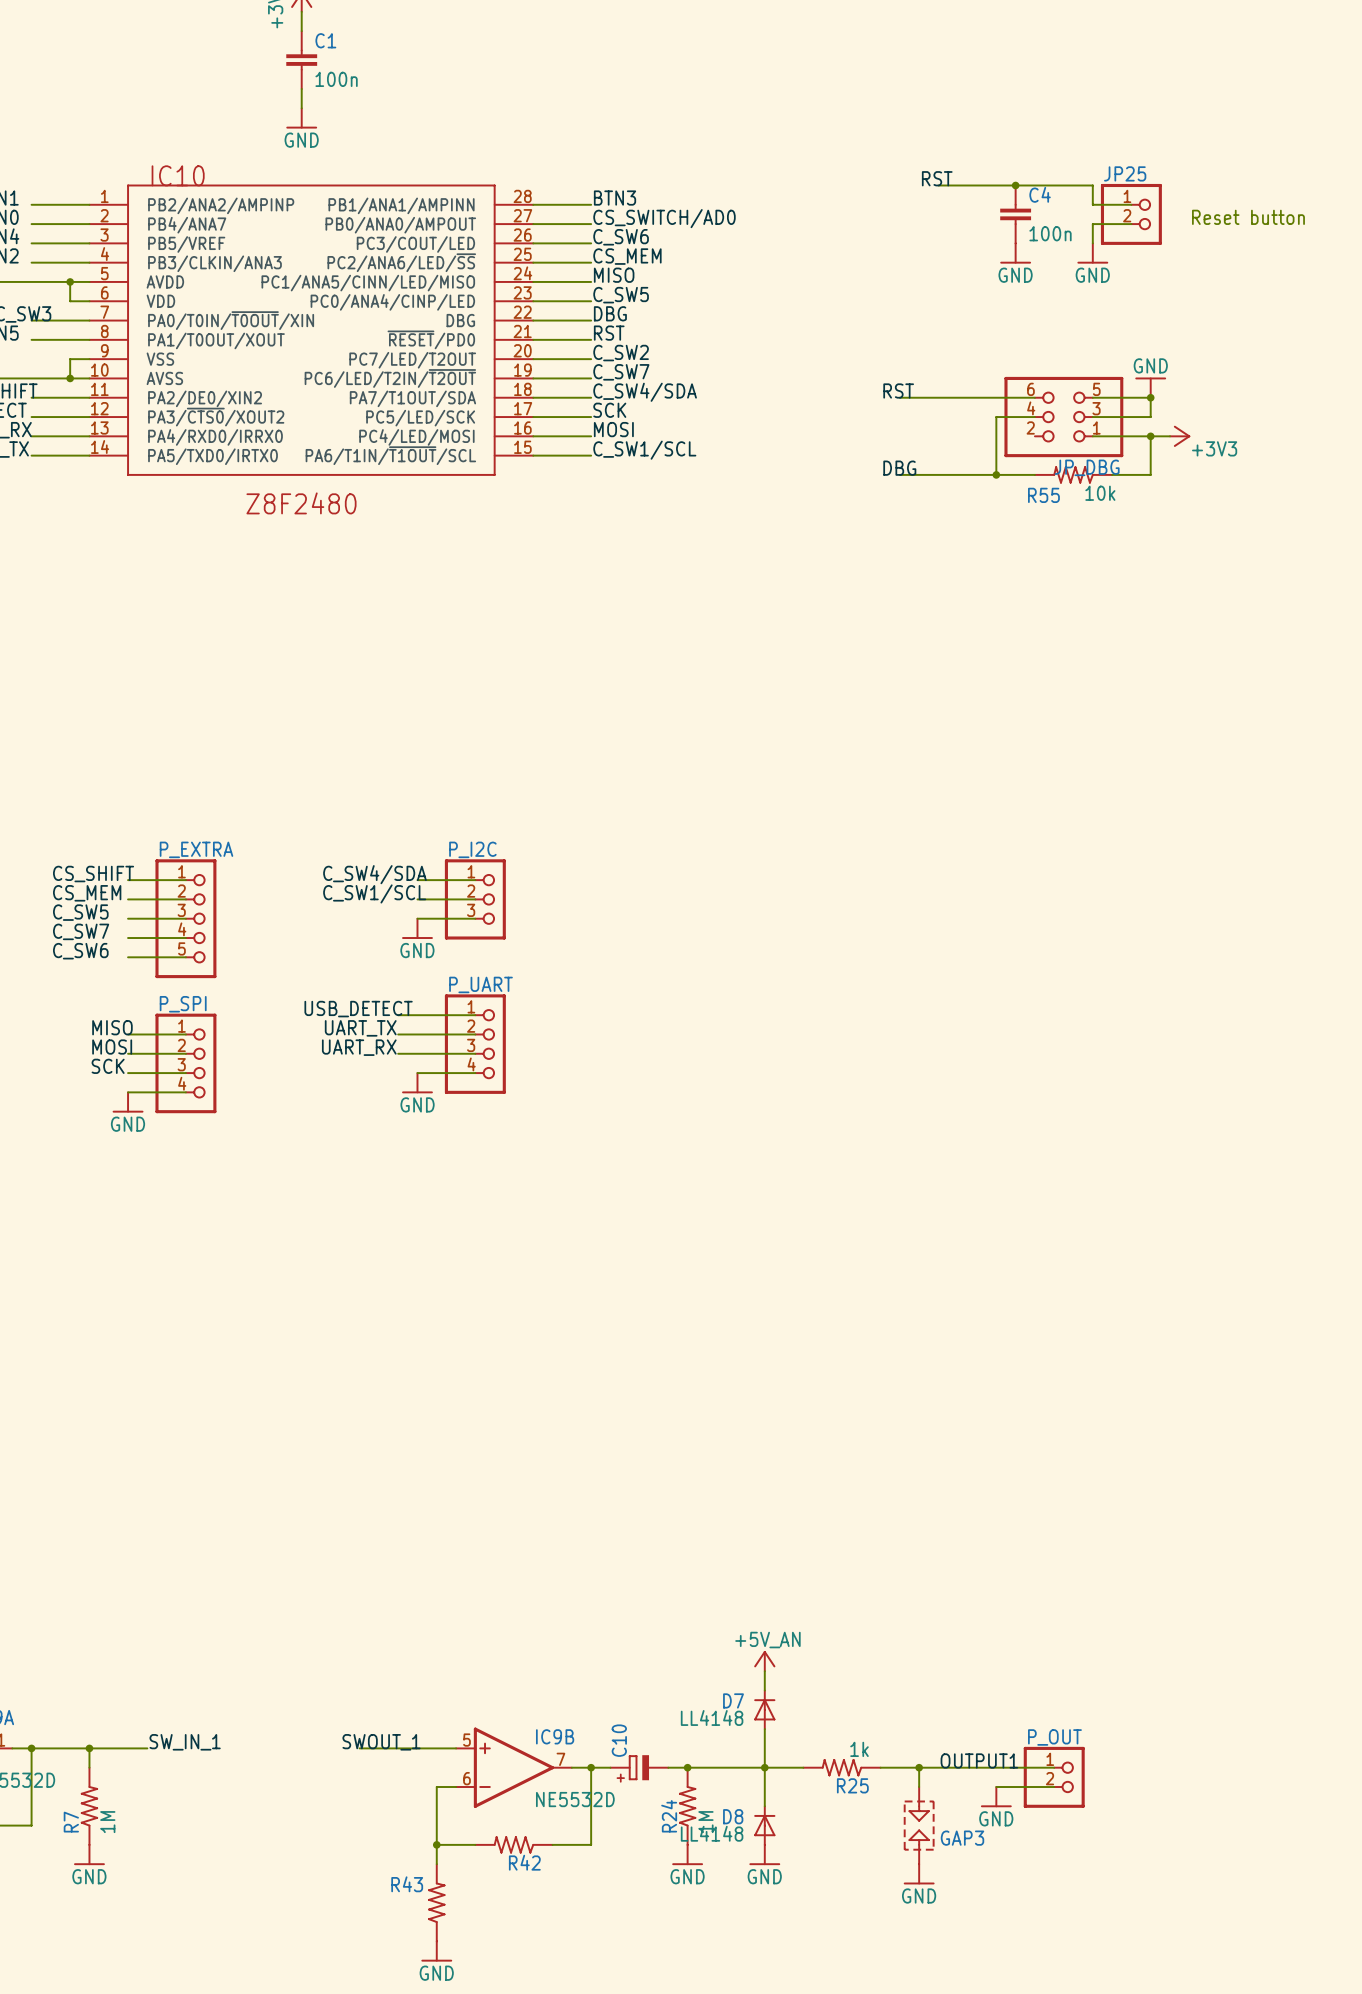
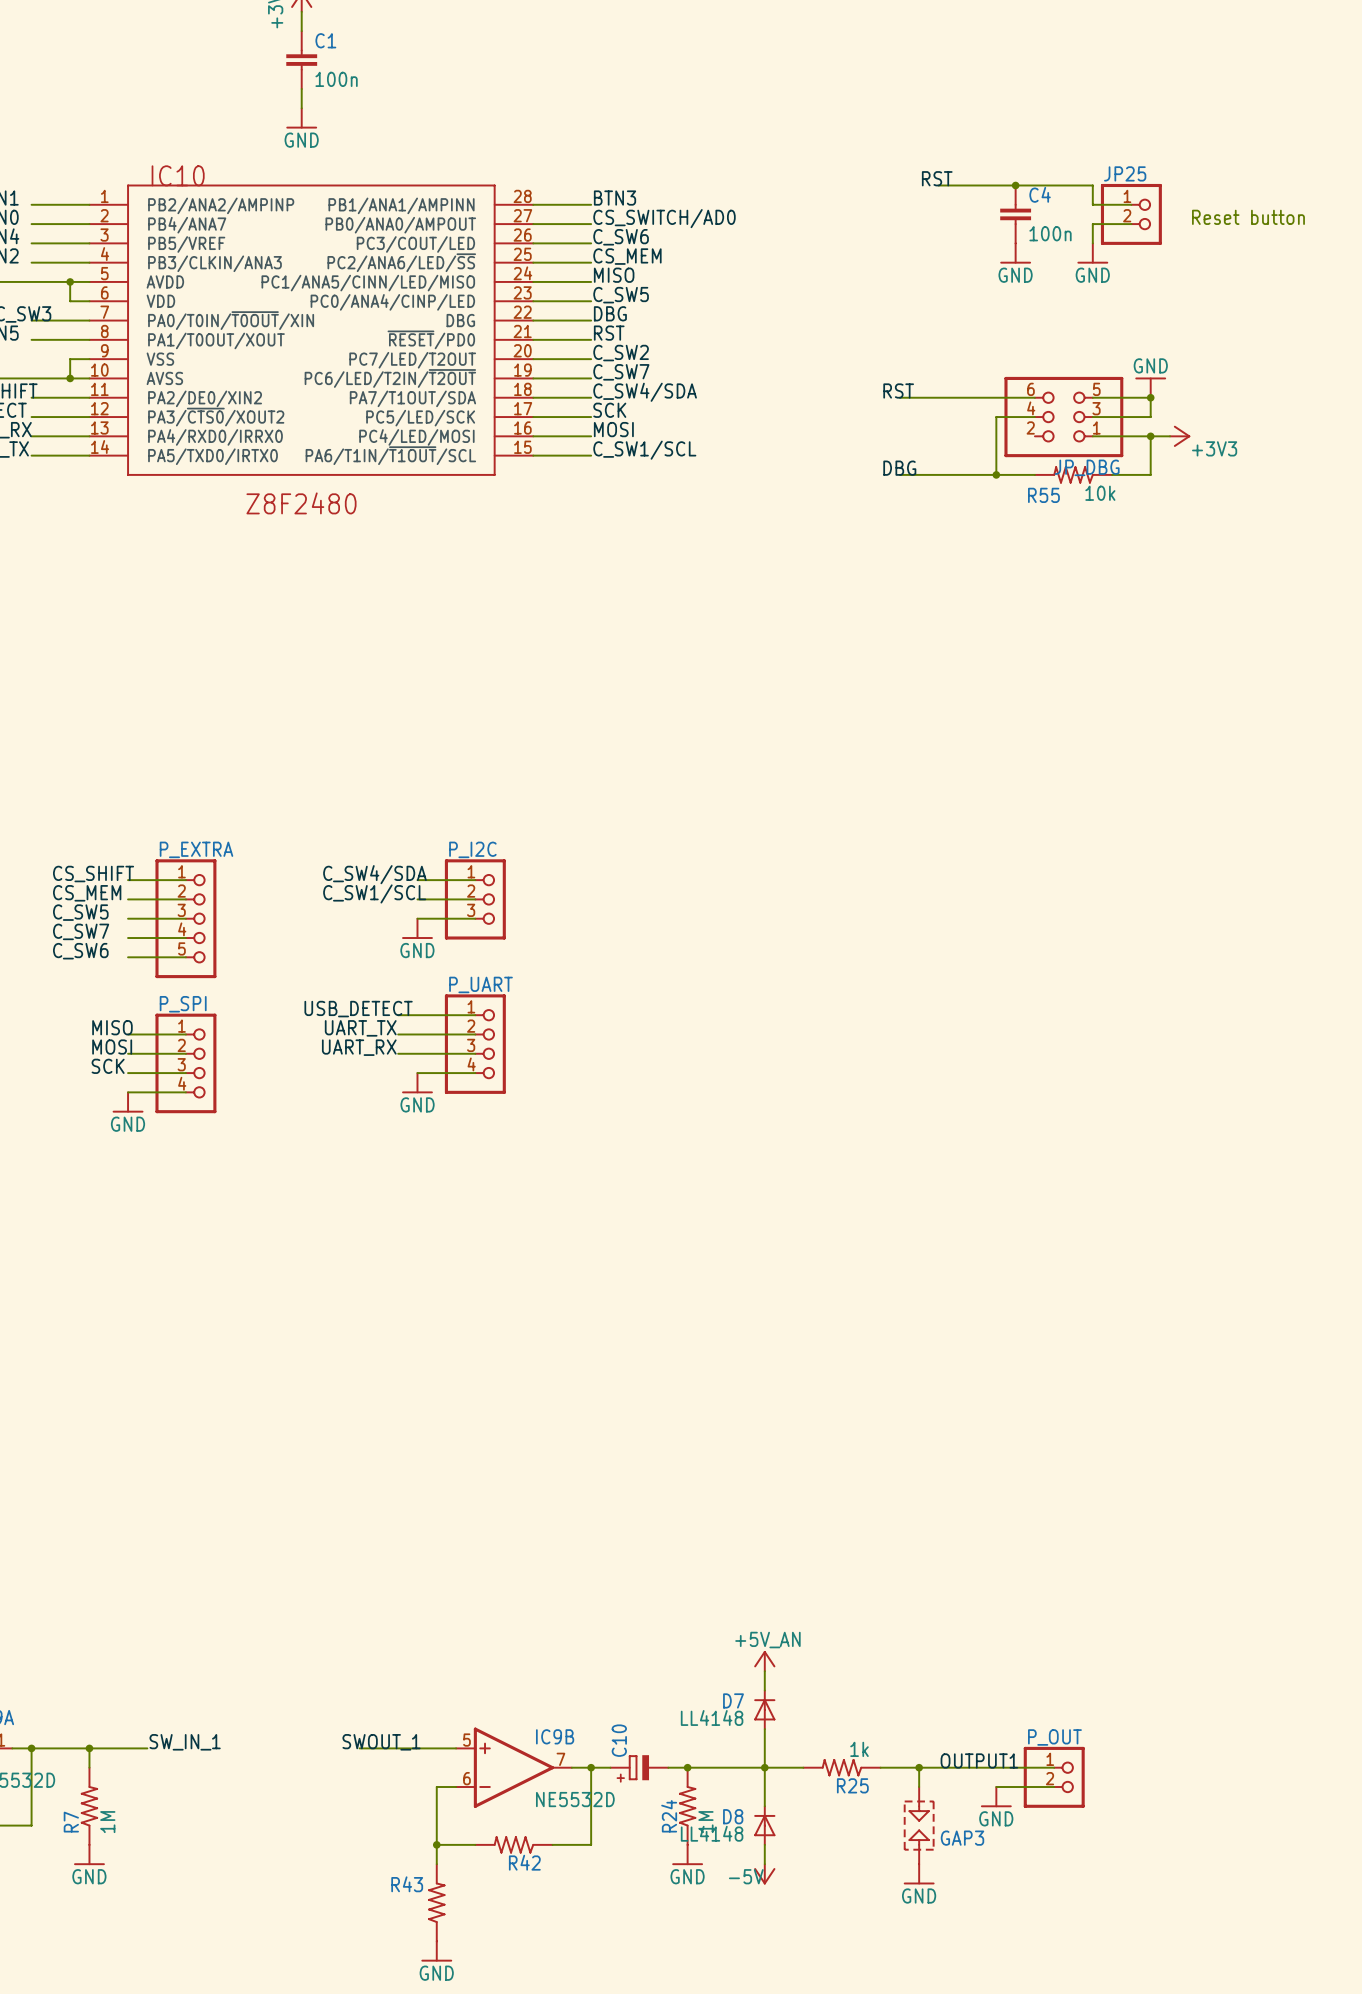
power symbol: GND (764, 1855) -> none
power symbol: none -> -5V (764, 1874)

